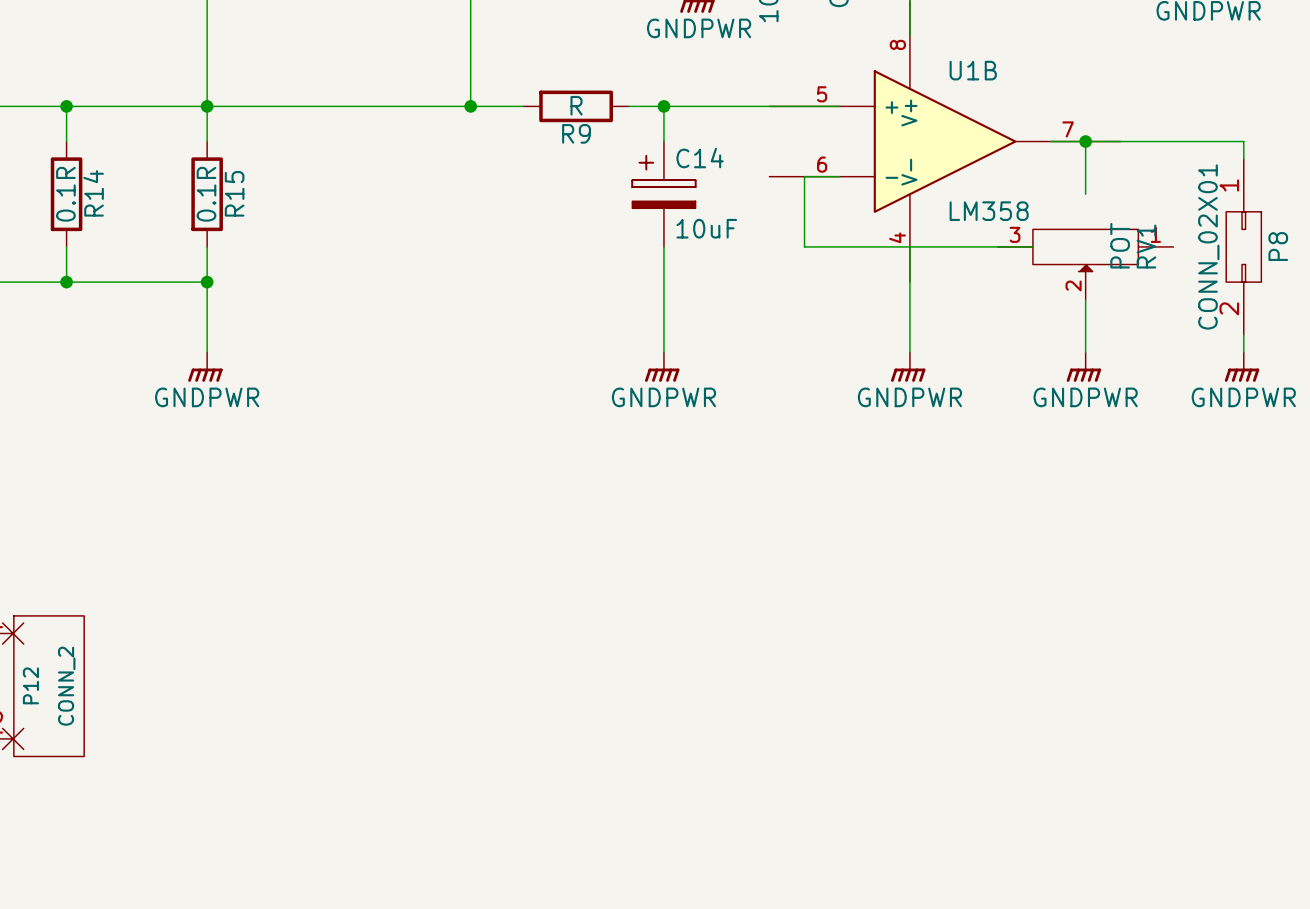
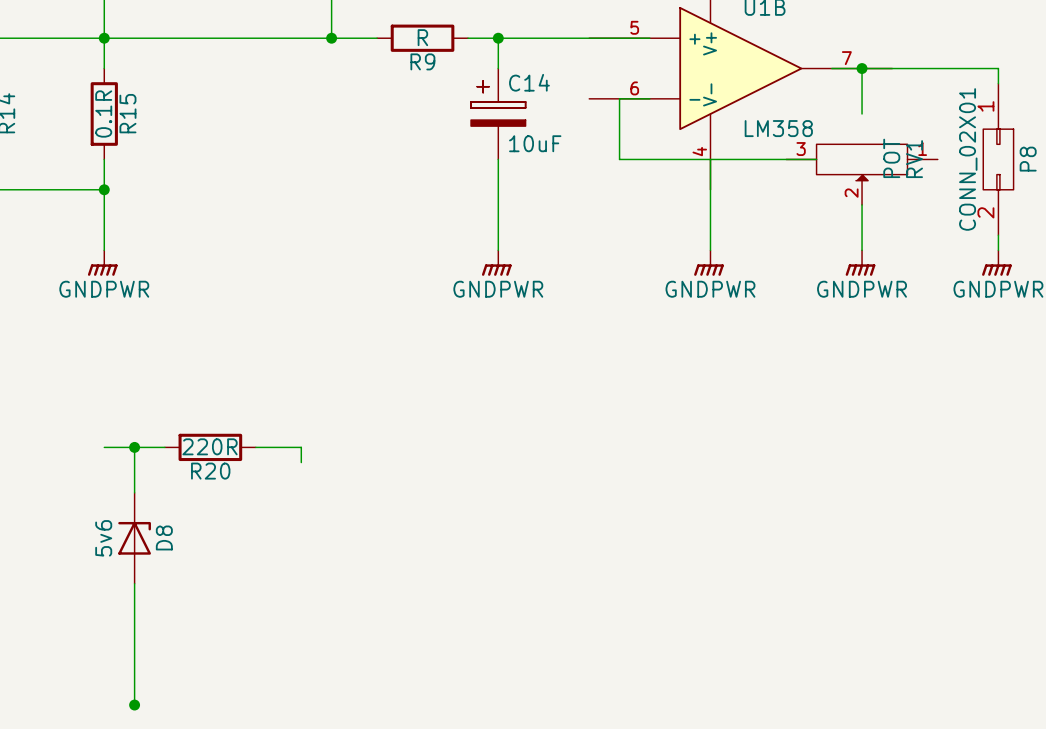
wire: none -> (104, 447) (164, 447)
wire: none -> (134, 447) (134, 492)
junction: none -> (134, 447)
R20: none -> 220R (210, 447)
wire: none -> (255, 447) (301, 447) (301, 462)
D8: none -> 5v6 (134, 538)
wire: none -> (134, 583) (134, 705)
junction: none -> (134, 705)

